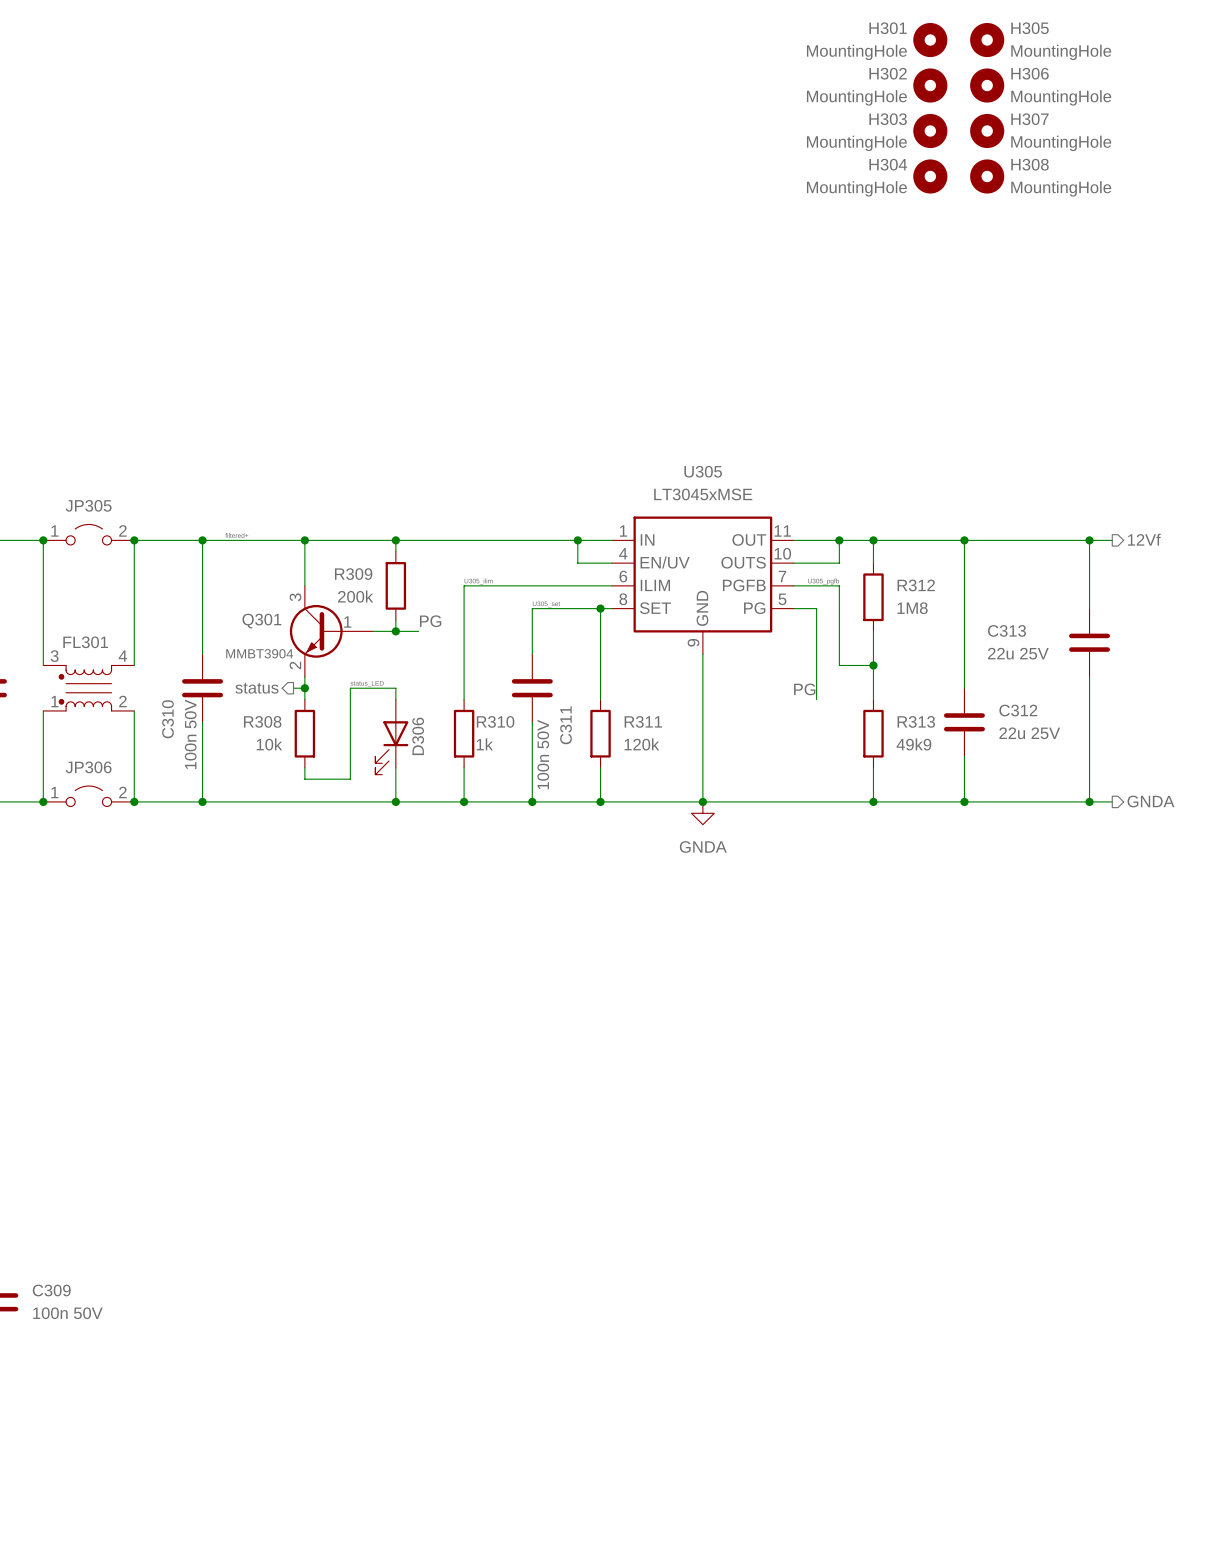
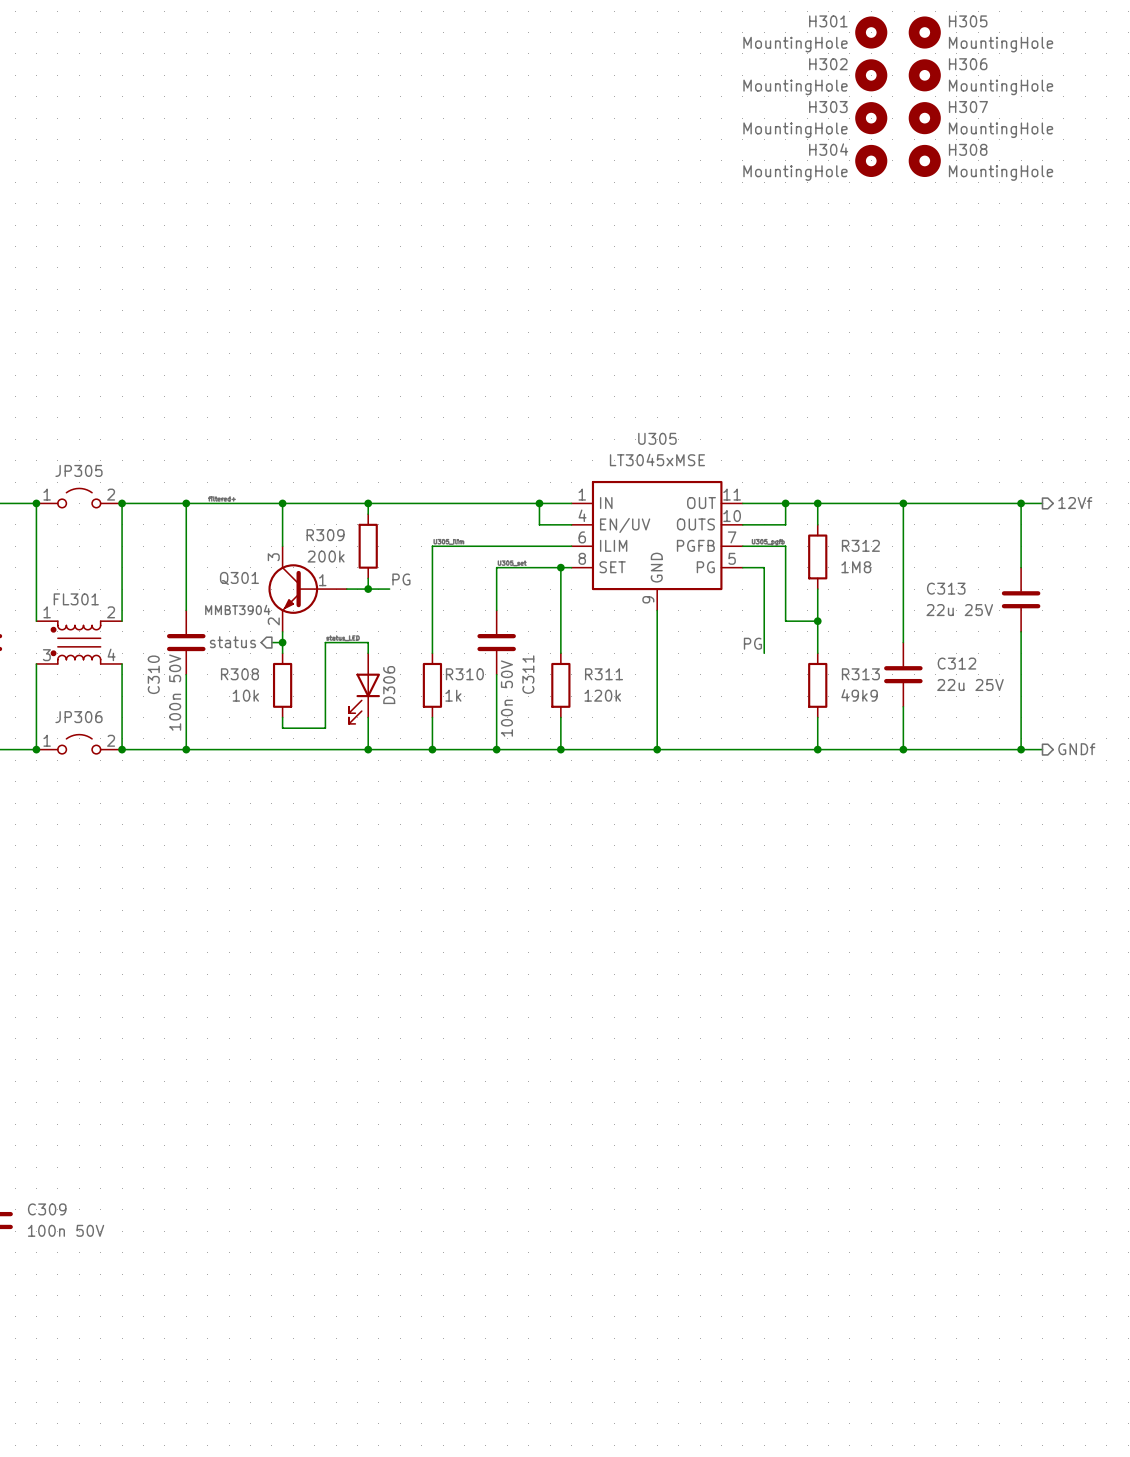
FL301 flip: as is (85, 688) -> up-down (76, 642)
hierarchical label: GNDA (1151, 801) -> GNDf (1076, 749)
power symbol: GNDA (702, 813) -> none

